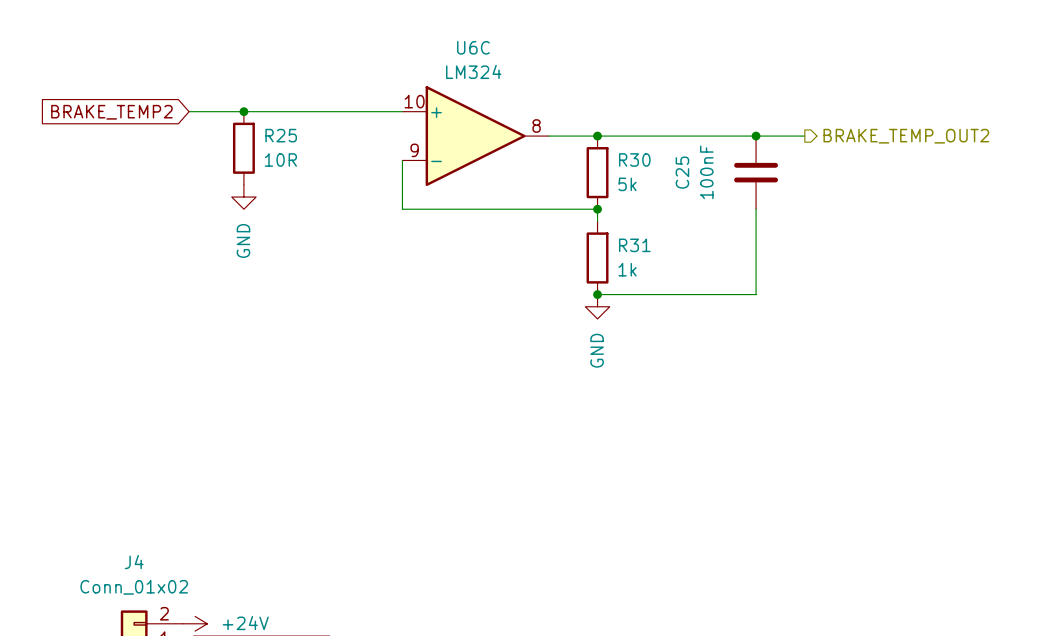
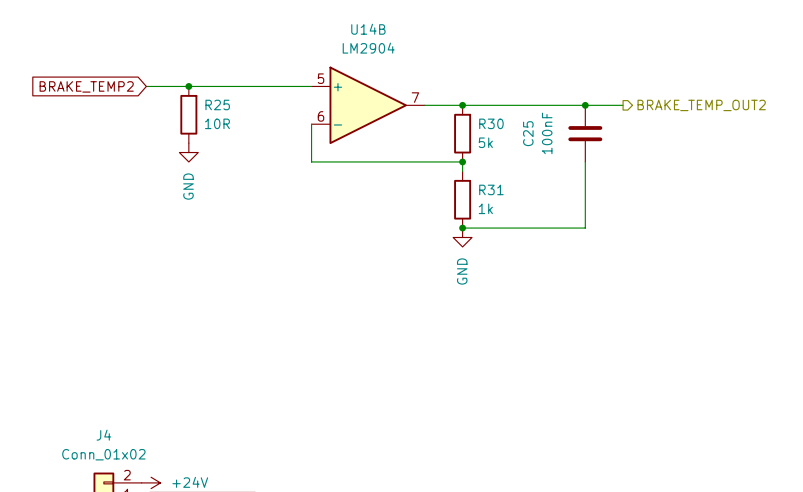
U6C name: U6C (473, 47) -> U14B (368, 29)
U6C value: LM324 (473, 71) -> LM2904 (368, 48)
U6C pin number: 10 (414, 101) -> 5 (321, 78)
U6C pin number: 8 (536, 126) -> 7 (415, 97)
U6C pin number: 9 (414, 150) -> 6 (321, 116)

